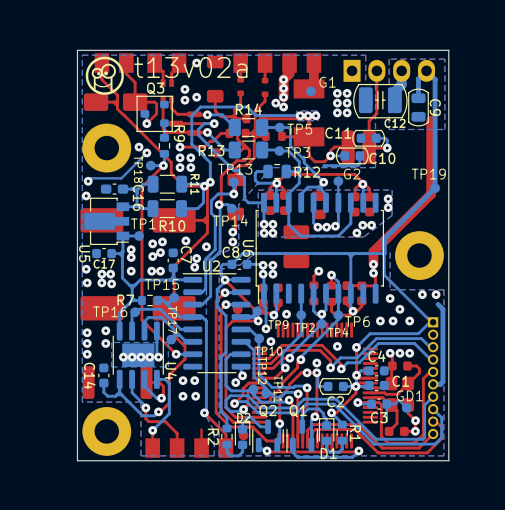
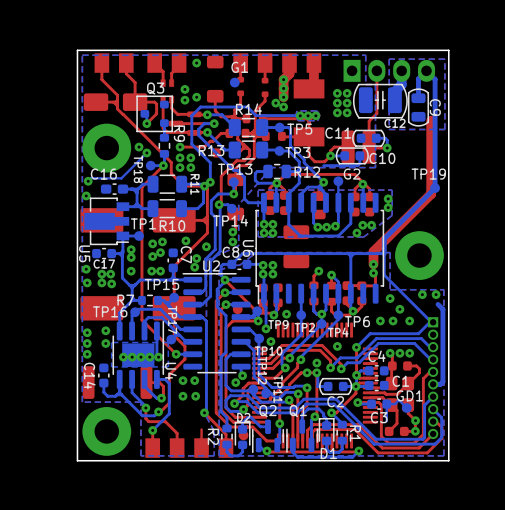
drawing: [85, 56, 124, 95] -> none
text: t13v02a (190, 67) -> none
G1 name position: G1 (327, 82) -> G1 (239, 67)
G1 position: (311, 91) -> (234, 82)
C16 name rotation: 0° (138, 197) -> 90° counterclockwise (103, 174)
C16 name position: C16 (138, 197) -> C16 (103, 174)

